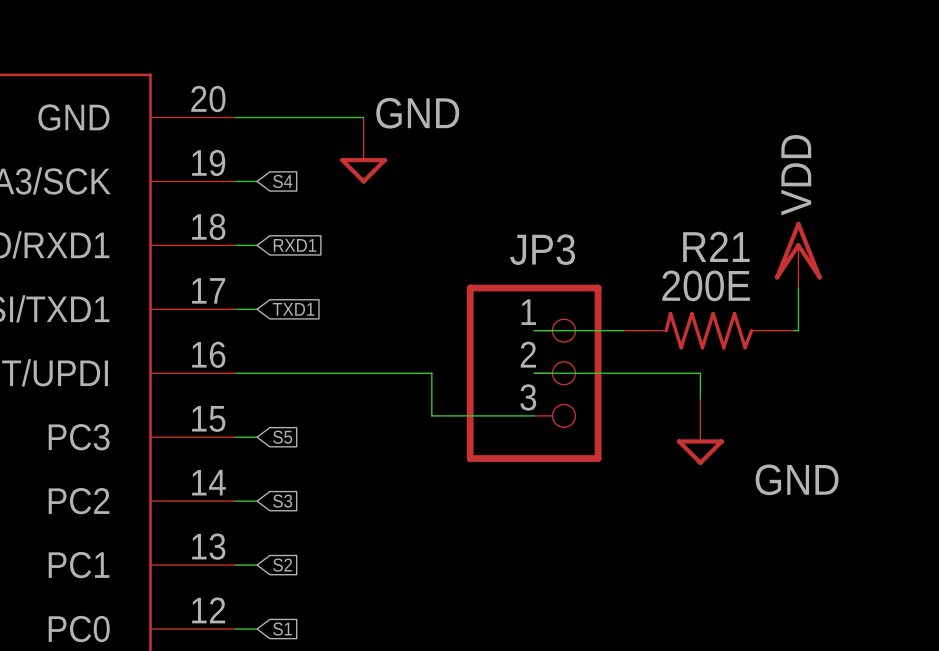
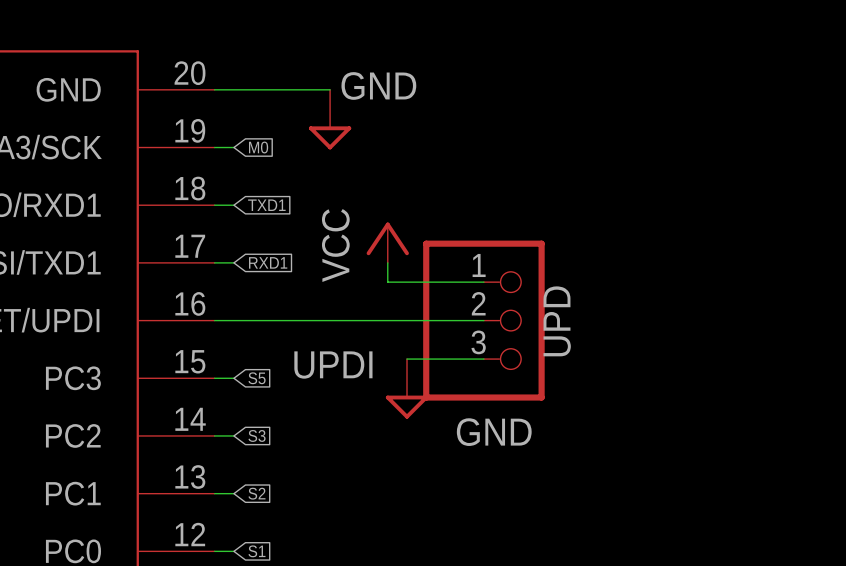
global label: S4 (282, 181) -> M0 (258, 147)
global label: RXD1 (294, 245) -> TXD1 (266, 205)
JP3 name: JP3 (542, 249) -> UPD (557, 321)
power symbol: VDD (798, 254) -> none
power symbol: none -> VCC (387, 242)
wire: (798, 288) (798, 330) (794, 330) -> none
global label: TXD1 (293, 309) -> RXD1 (268, 262)
wire: (534, 330) (623, 330) -> (483, 282) (387, 282) (387, 262)
R21: 200E (708, 330) -> none
wire: (431, 373) (431, 415) (448, 415) -> (391, 320) (483, 320)
wire: (534, 373) (700, 373) (700, 398) -> none
label: none -> UPDI (333, 365)
power symbol position: GND (700, 431) -> GND (407, 388)

